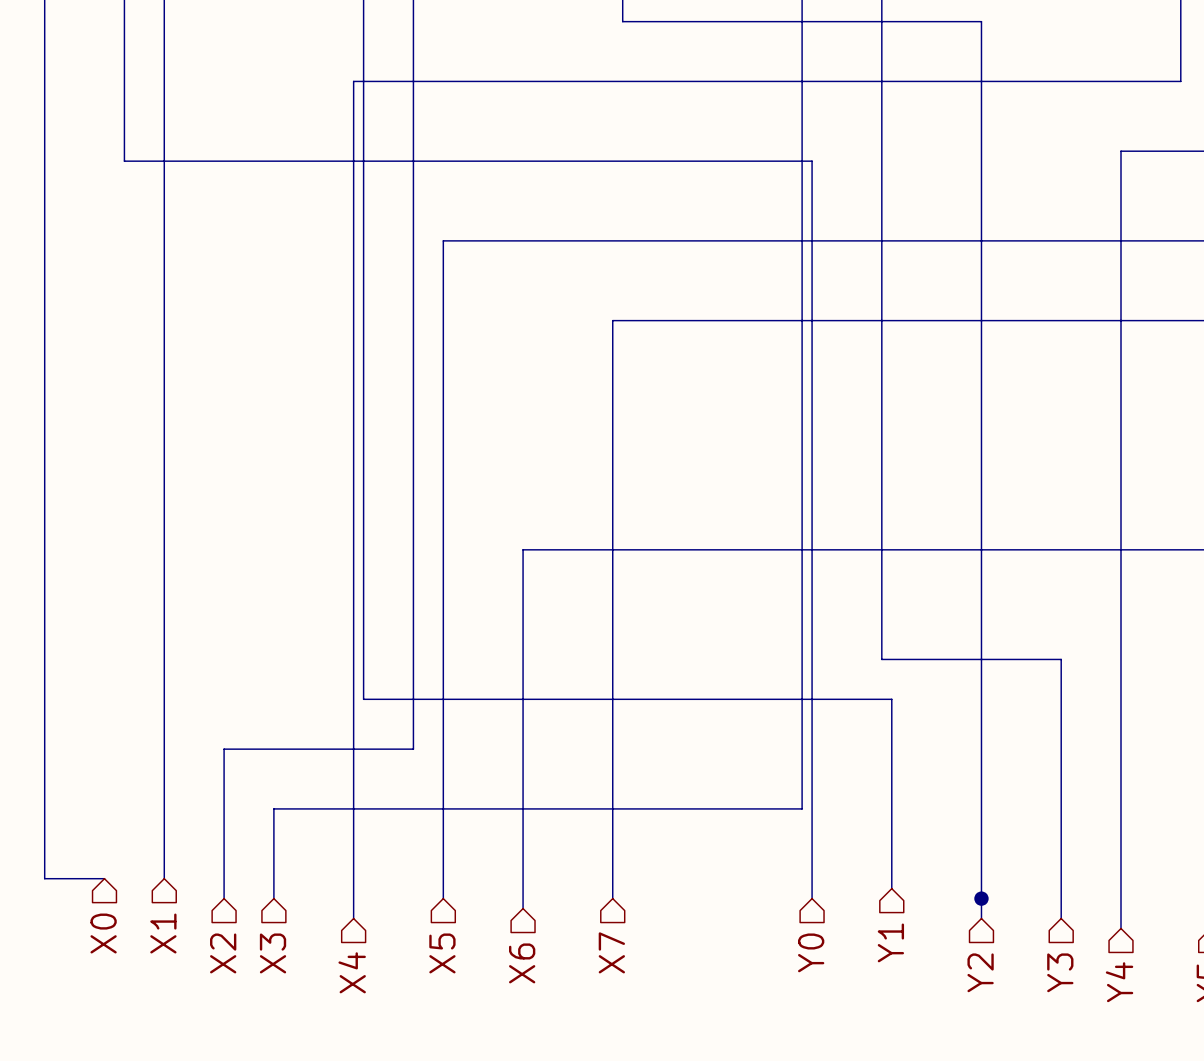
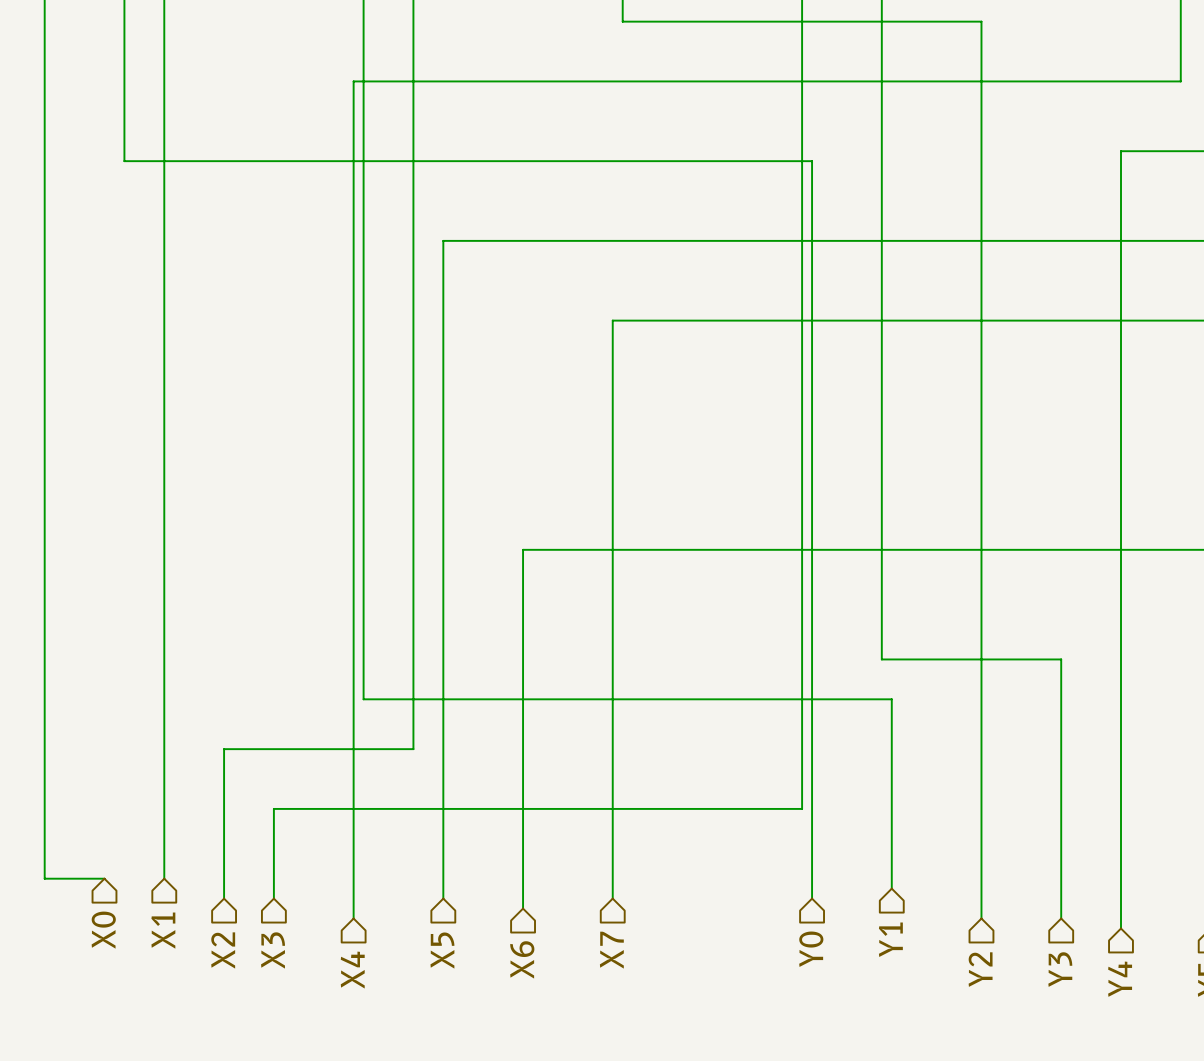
junction: (981, 898) -> none

